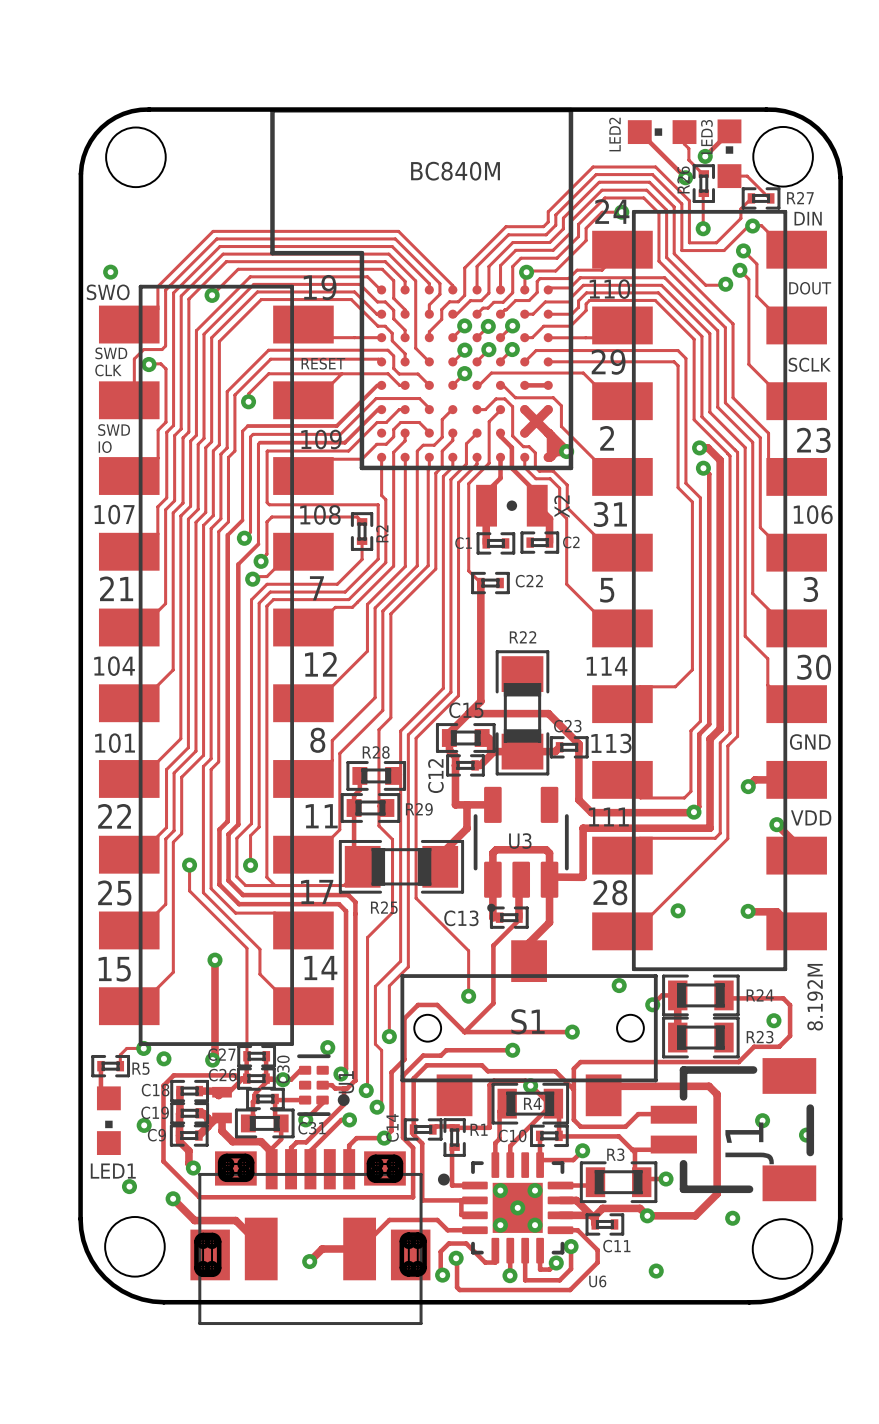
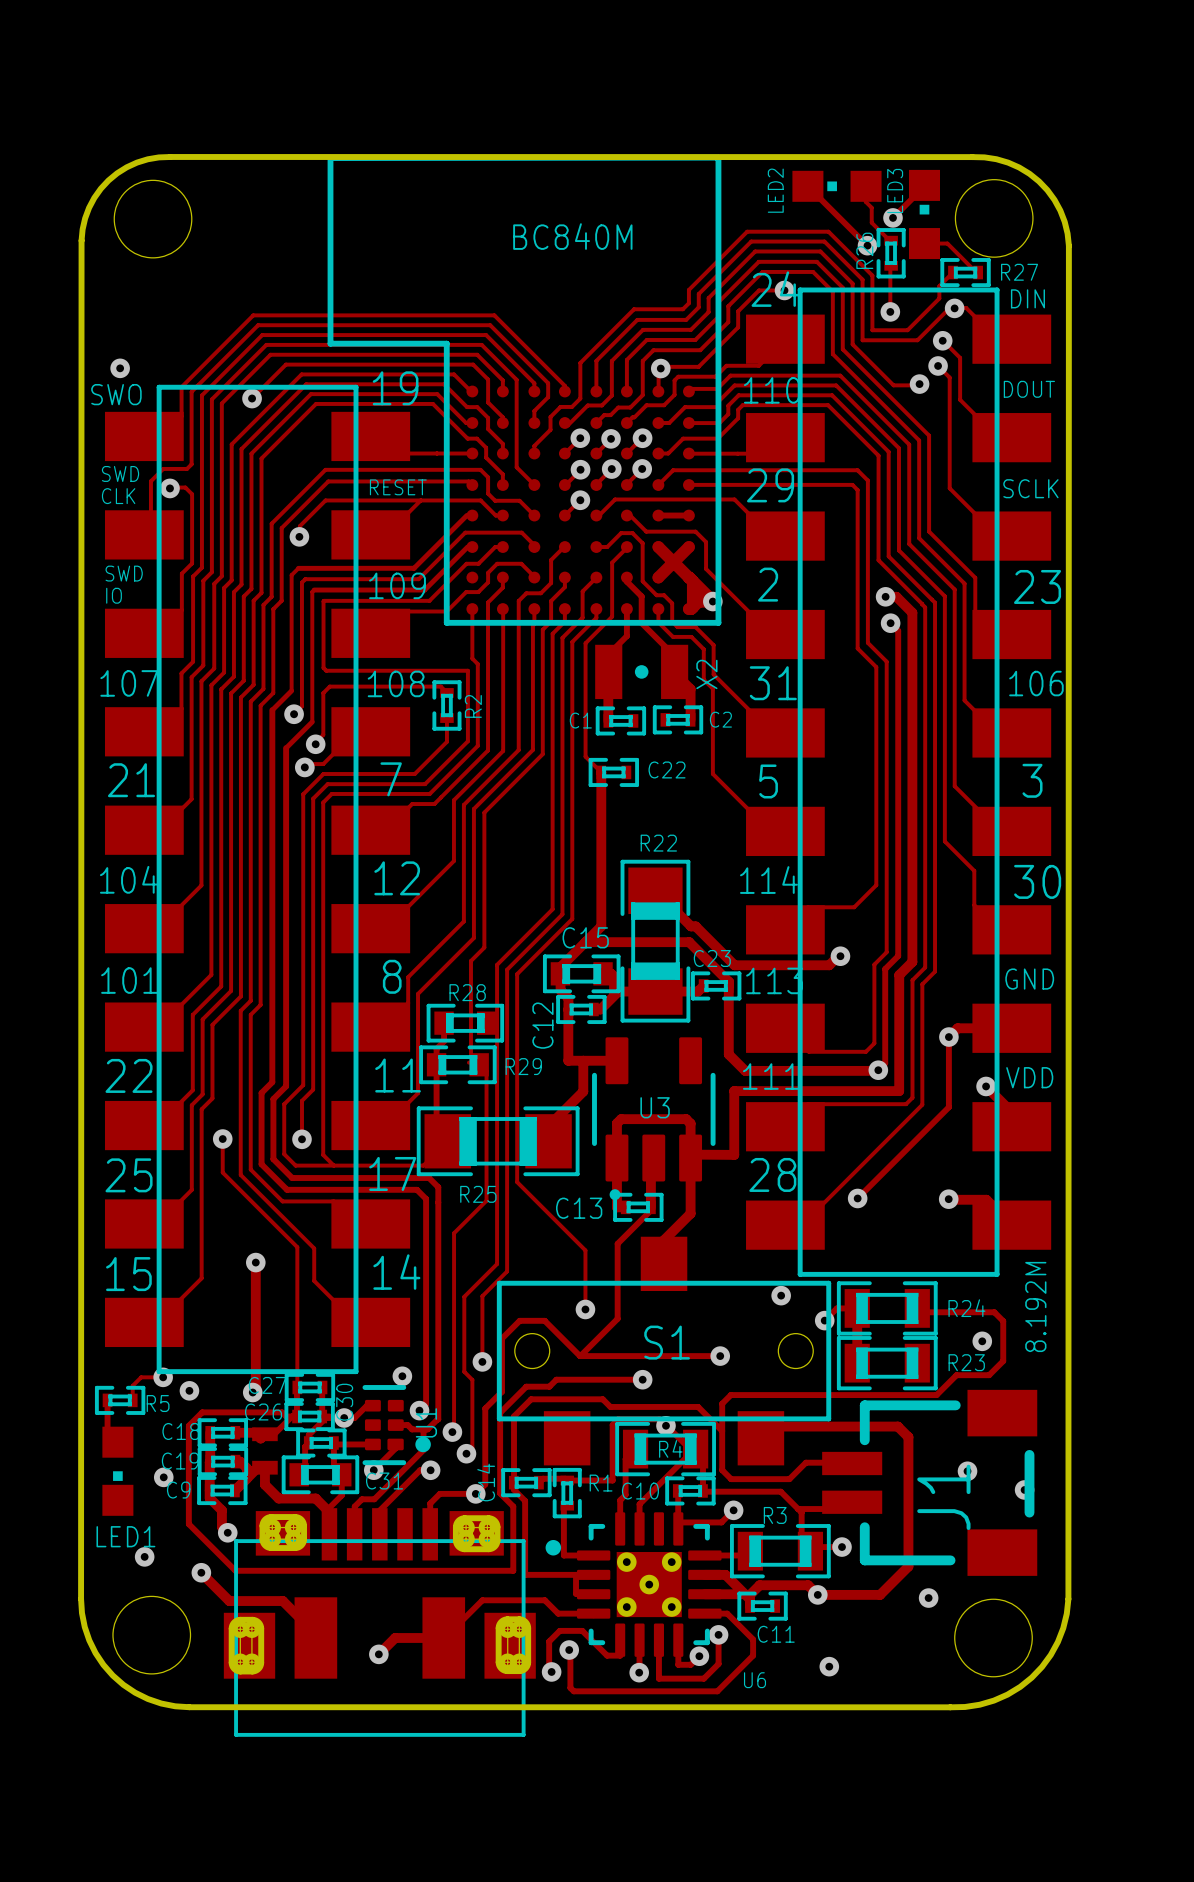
track: none -> (655, 890) (691, 926) (695, 926) (734, 965) (829, 965) (840, 956)
via: none -> (840, 956)
track: (380, 728) (378, 729) (378, 825) (392, 839) -> (470, 960) (470, 1056) (477, 1062)
track: none -> (948, 1037) (948, 1107) (857, 1198)
track: none -> (479, 1069) (480, 1064) (486, 1071) (486, 1105)

